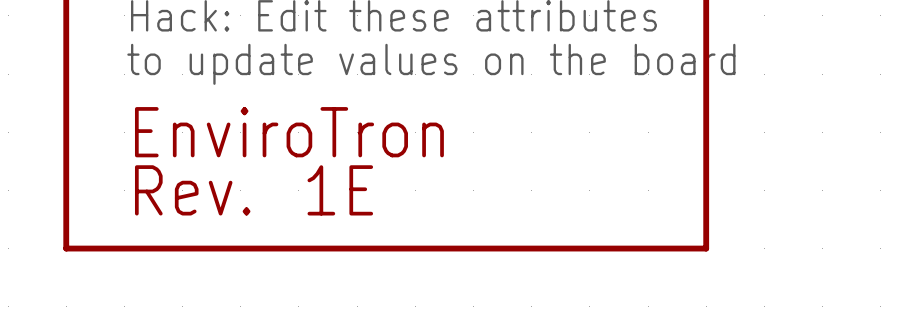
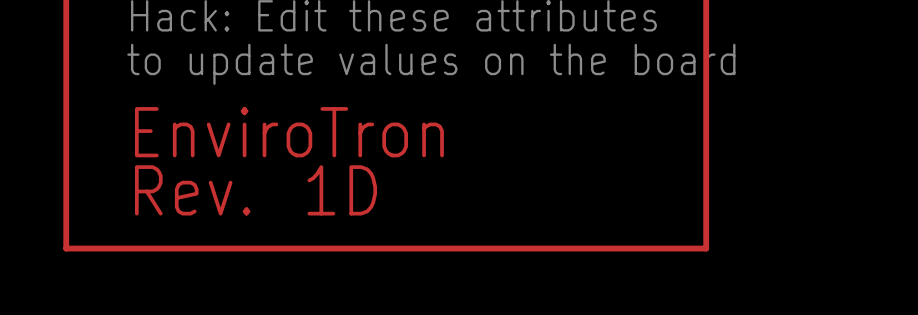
part text: 1E (340, 190) -> 1D (342, 190)

